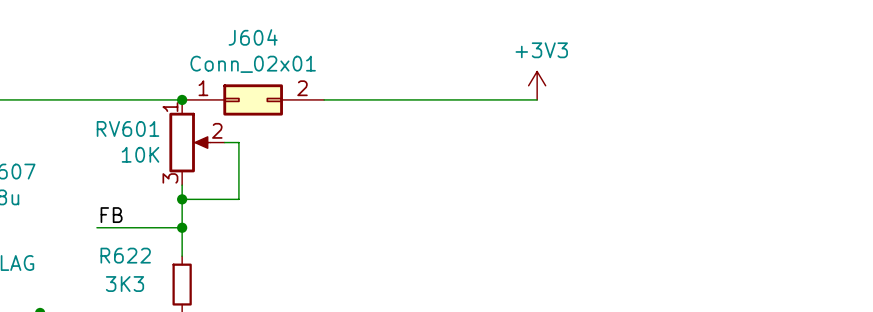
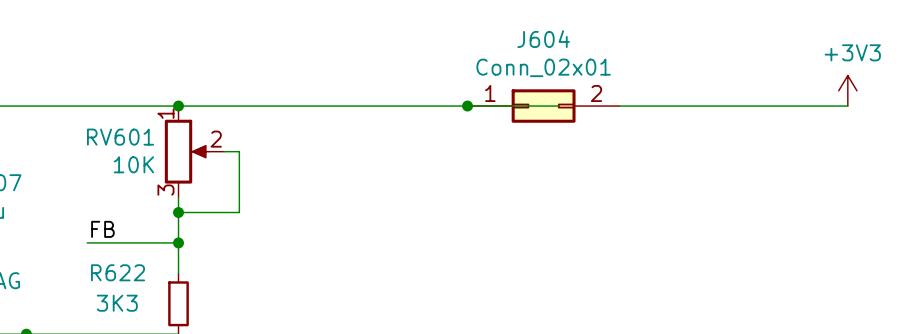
power symbol position: +3V3 (537, 85) -> +3V3 (847, 90)
J604 position: (253, 99) -> (543, 106)
junction: none -> (467, 106)
wire: none -> (619, 106) (847, 106)

